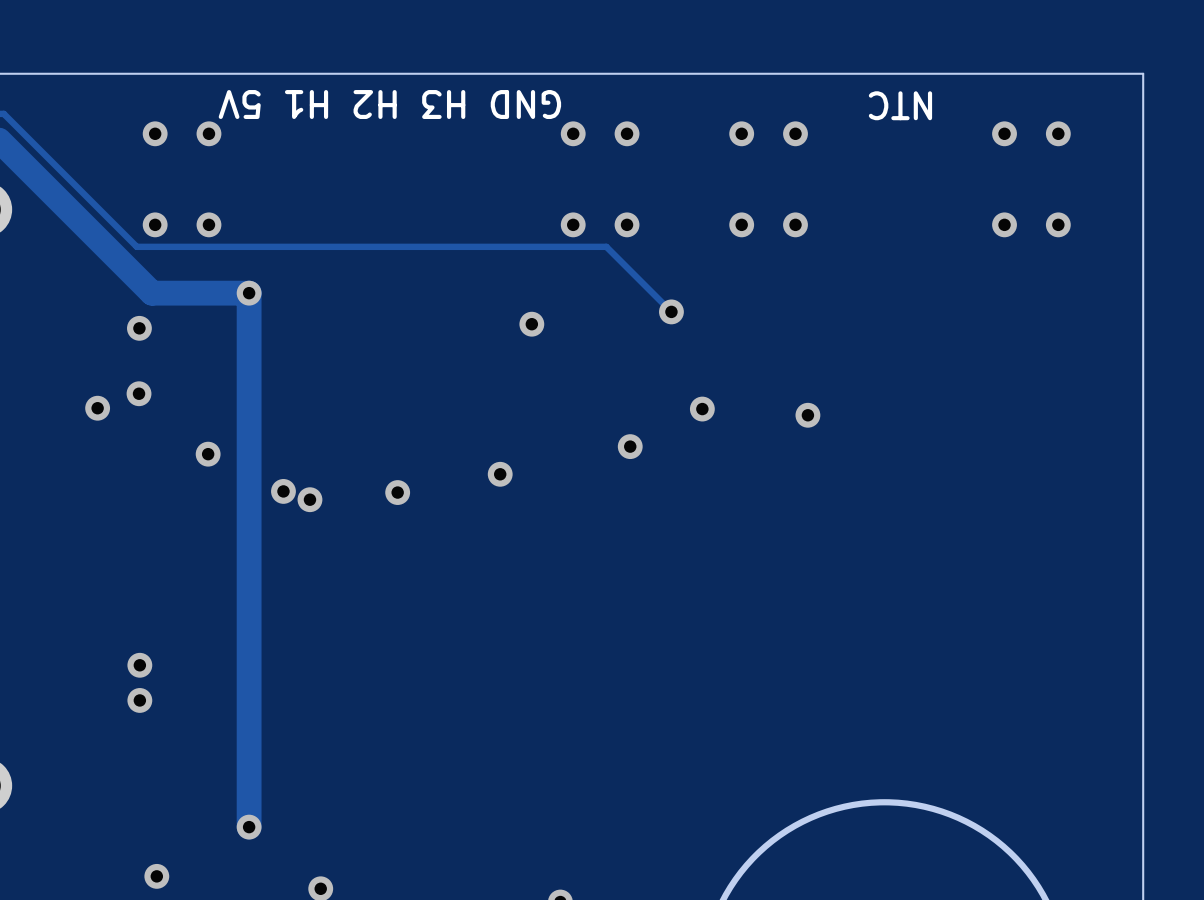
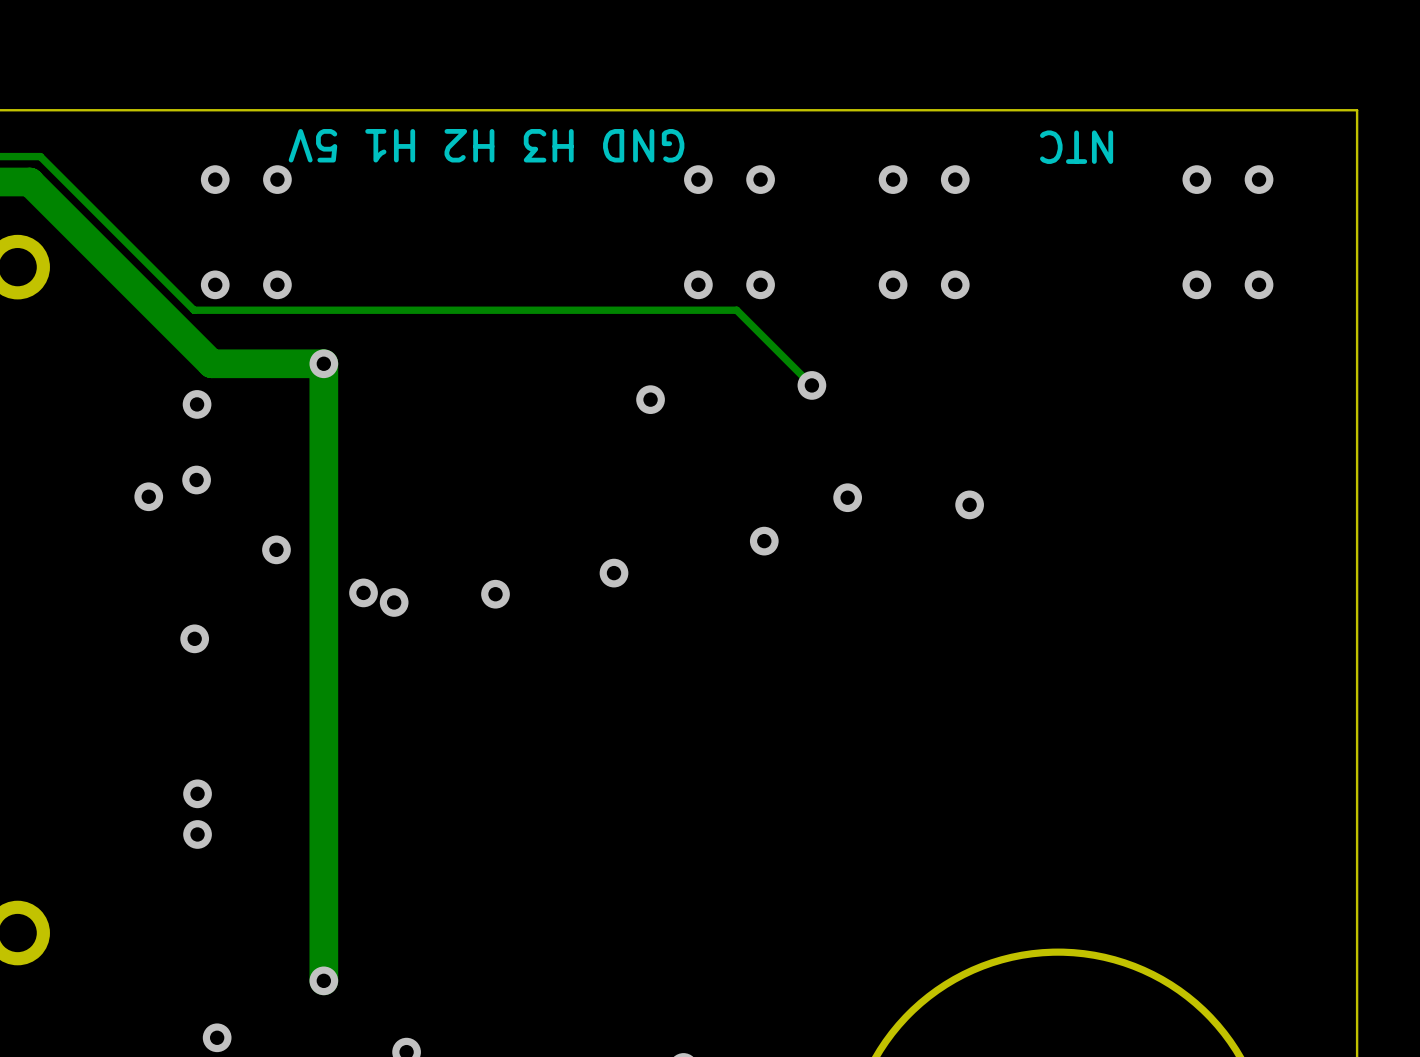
via: none -> (194, 638)

